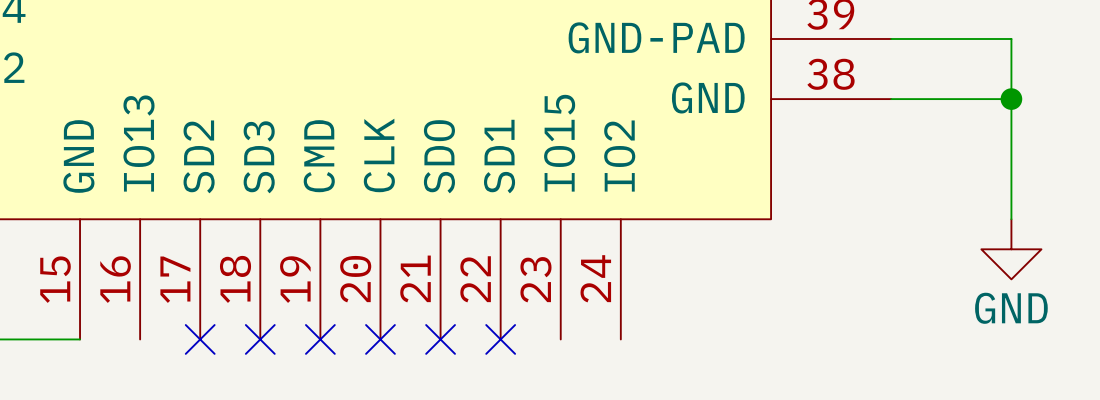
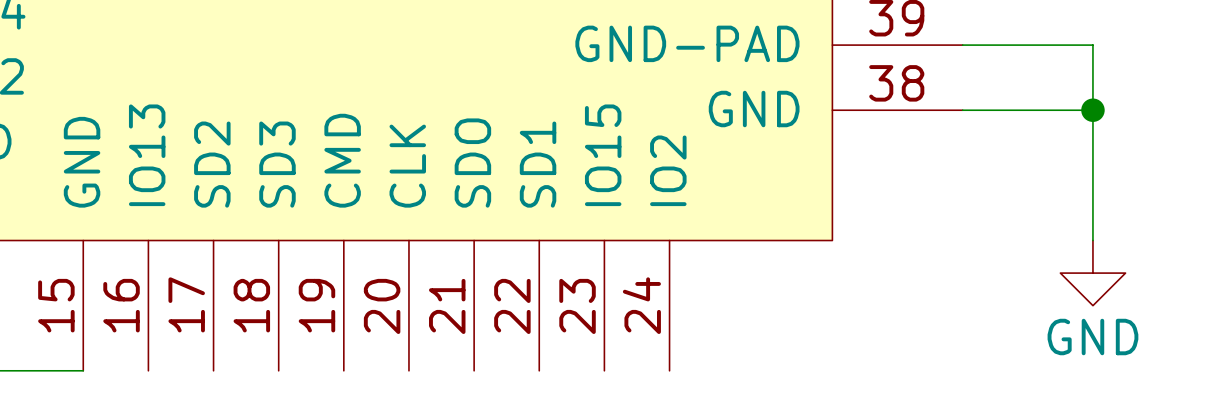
no-connect mark: (200, 339) -> none
no-connect mark: (260, 339) -> none
no-connect mark: (320, 339) -> none
no-connect mark: (380, 339) -> none
no-connect mark: (440, 339) -> none
no-connect mark: (500, 339) -> none

